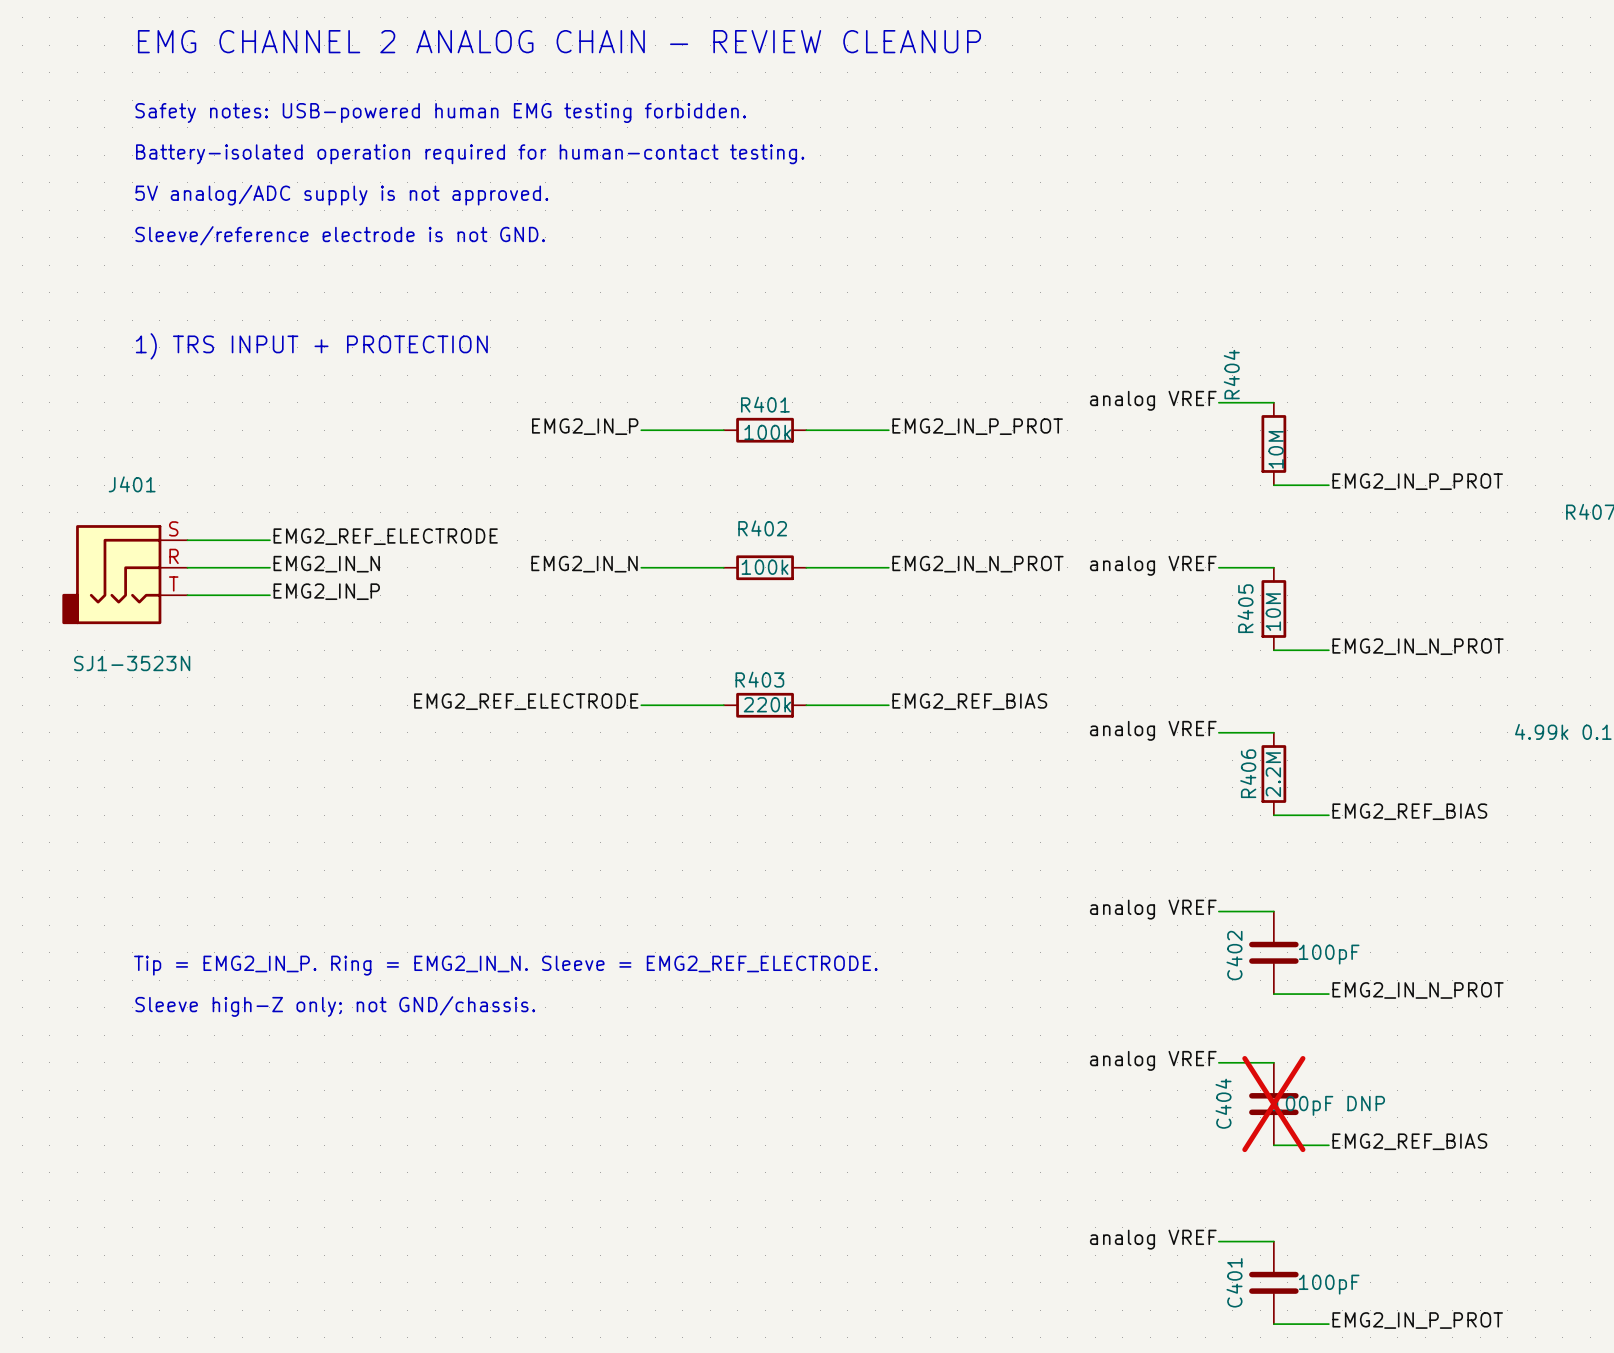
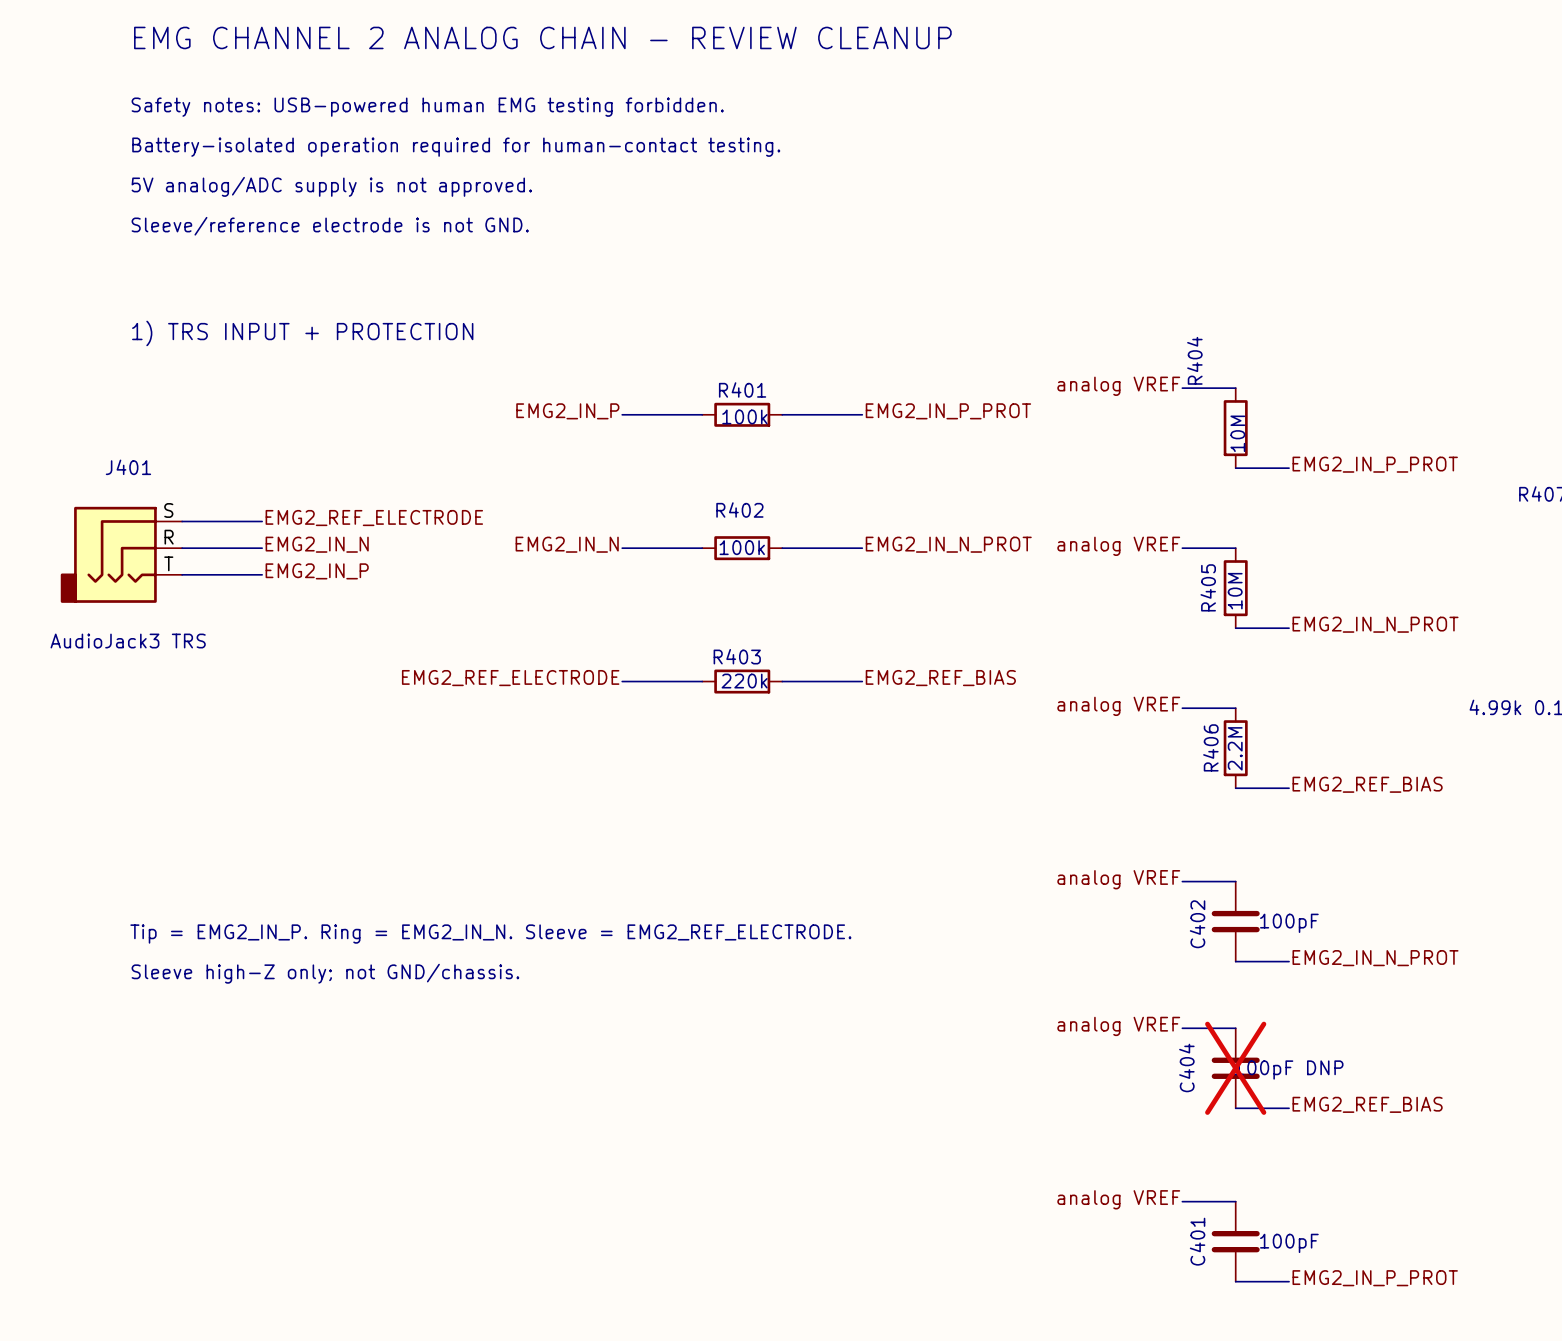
J401 value: SJ1-3523N (132, 663) -> AudioJack3 TRS (128, 641)

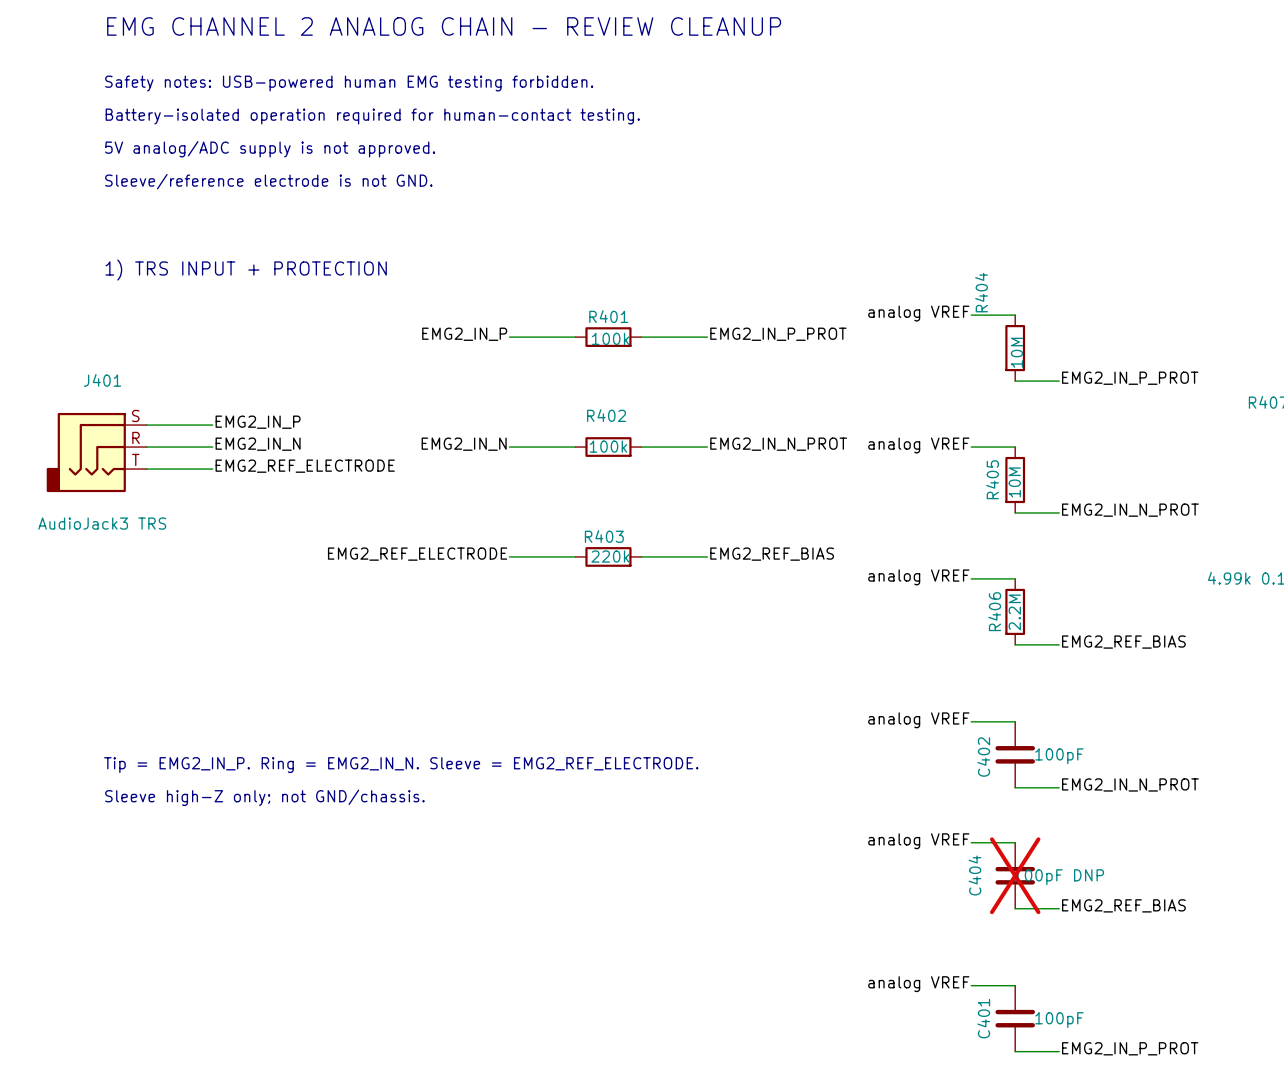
label: EMG2_REF_ELECTRODE (374, 518) -> EMG2_IN_P (258, 422)
label: EMG2_IN_P (317, 571) -> EMG2_REF_ELECTRODE (305, 466)

